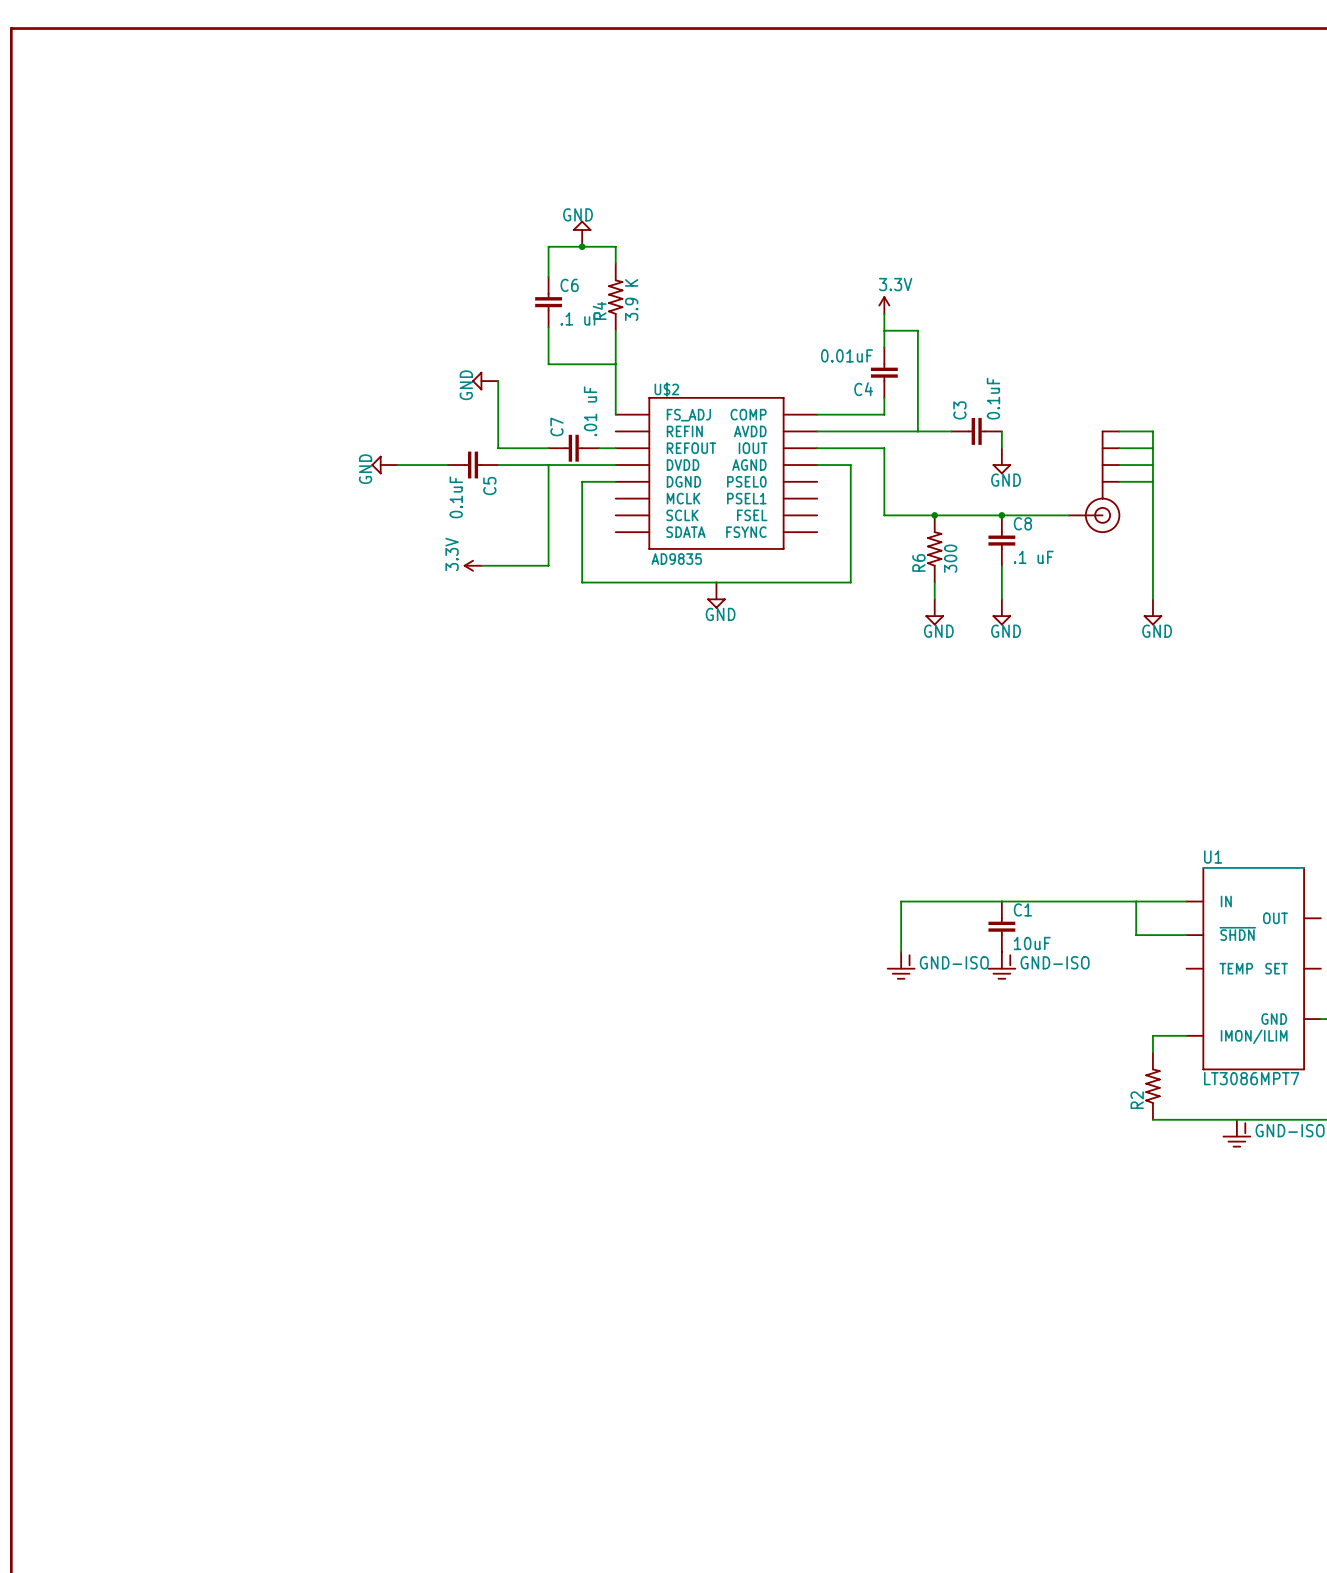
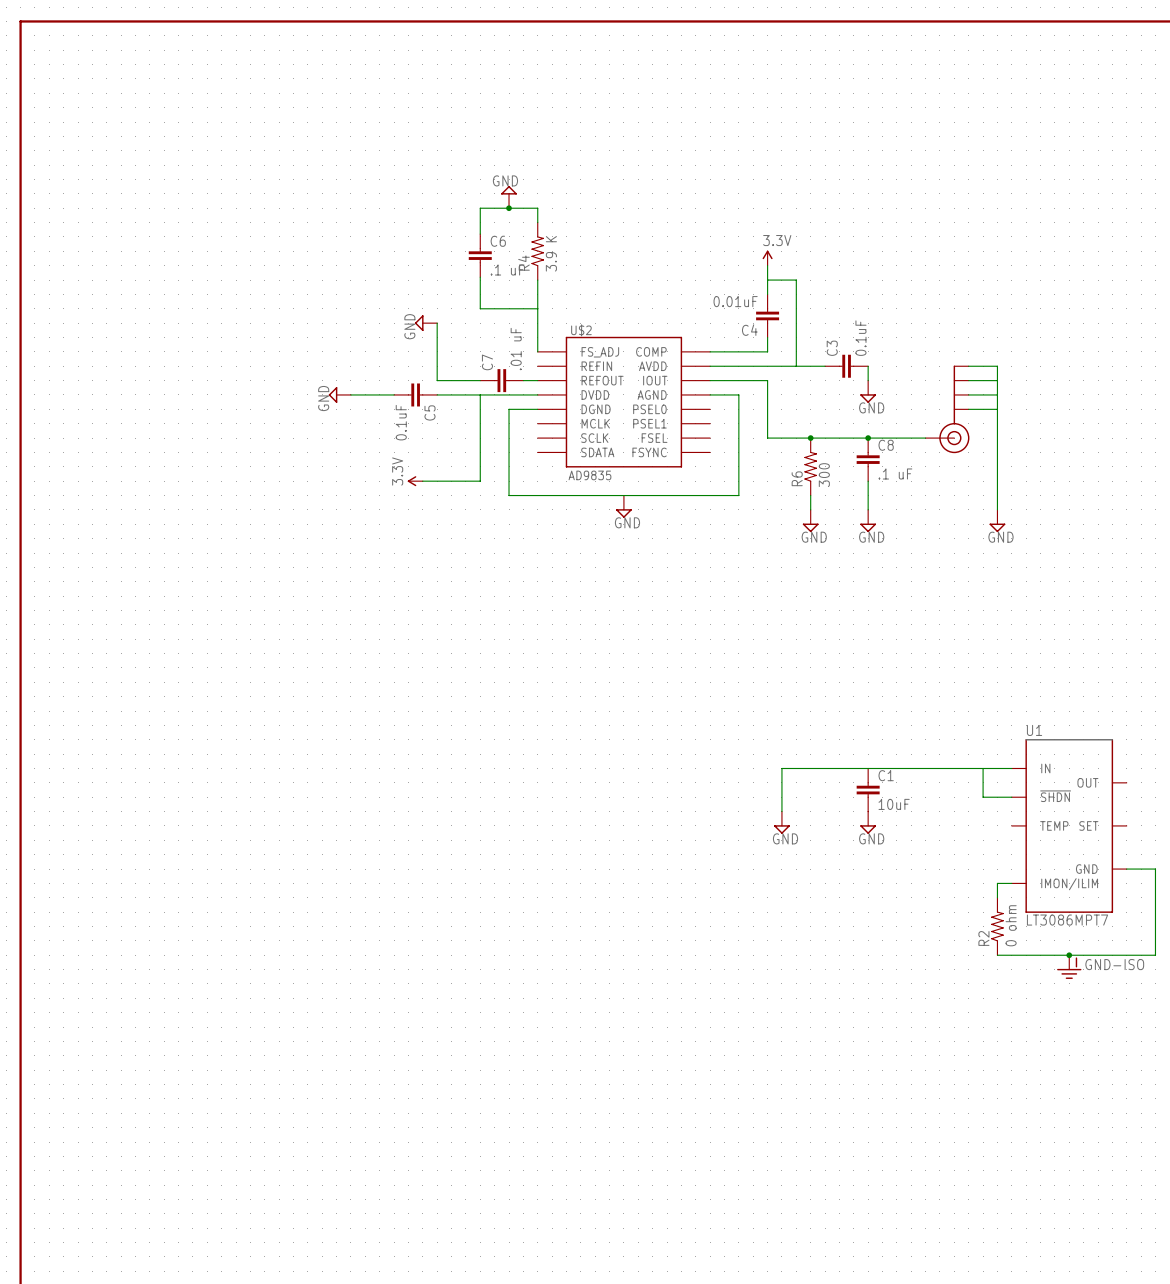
power symbol: GND-ISO (901, 965) -> GND (781, 822)
power symbol: GND-ISO (1001, 965) -> GND (868, 822)
U1 position: (1253, 968) -> (1069, 825)
R2 value: none -> 0 ohm (1011, 925)
junction: none -> (1069, 955)

